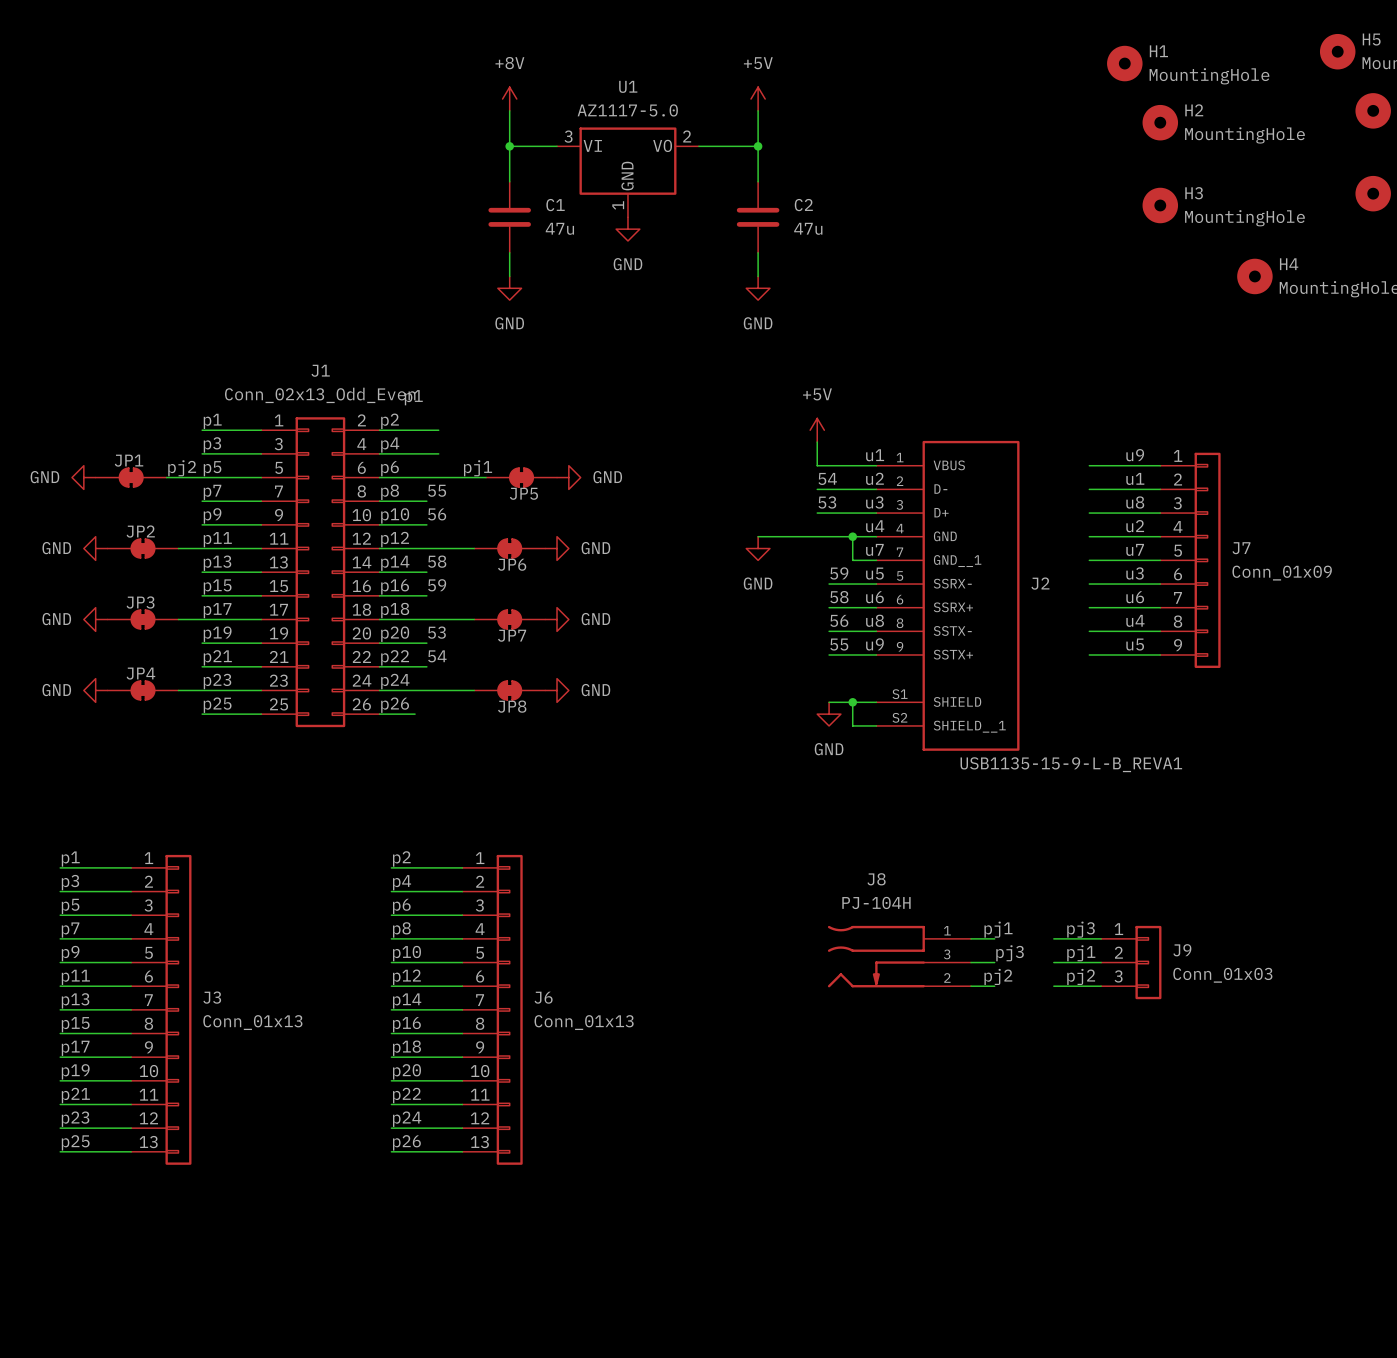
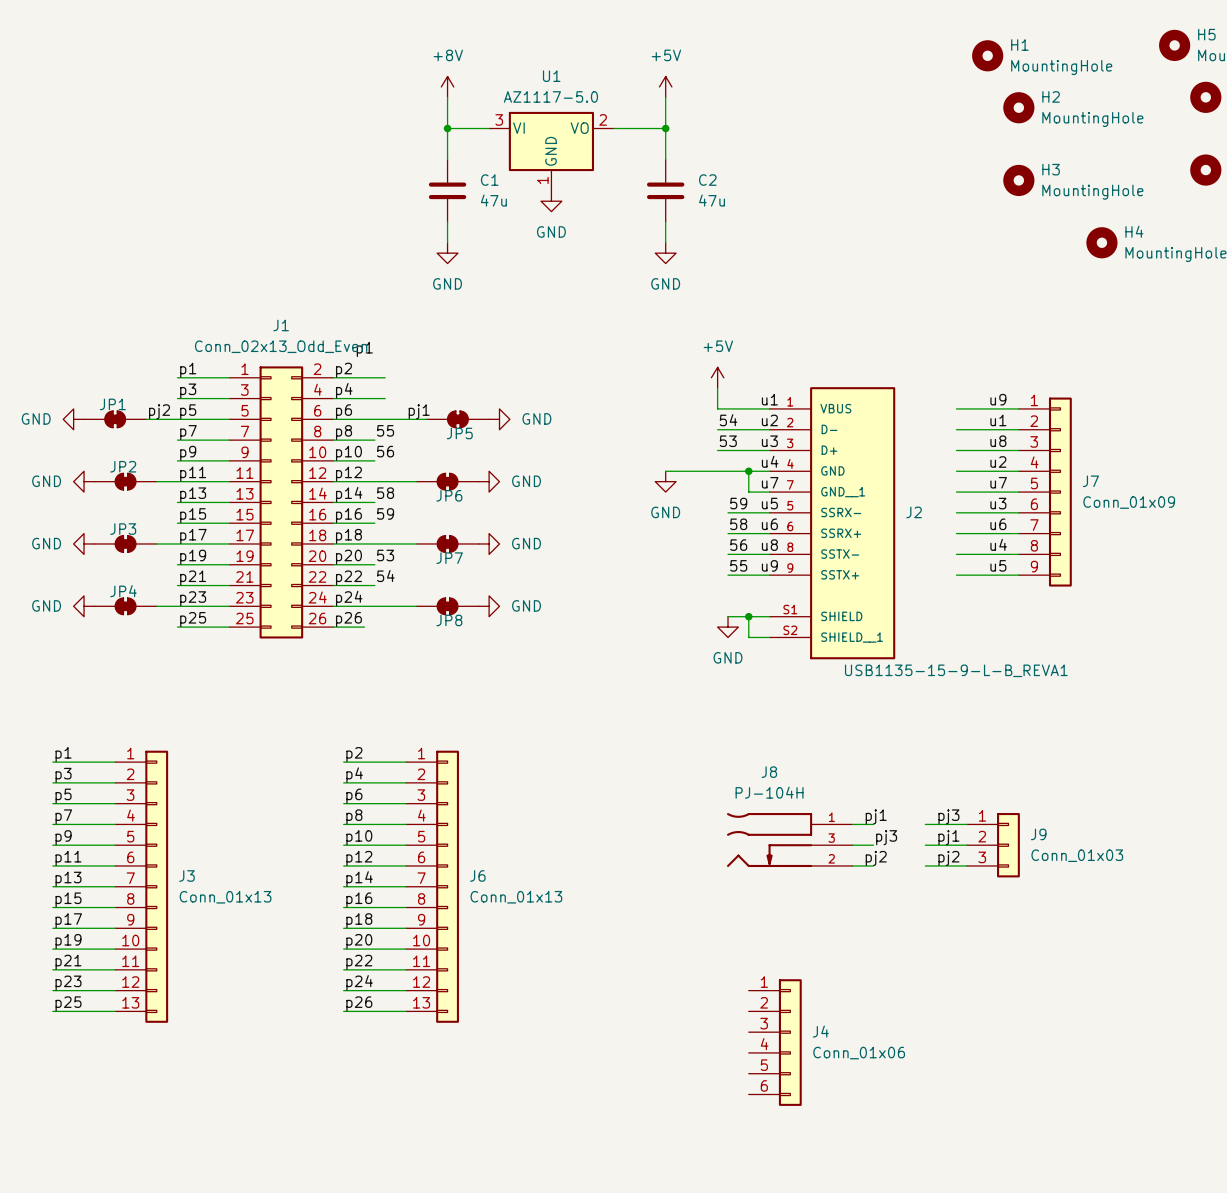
J4: none -> Conn_01x06 (775, 1042)

